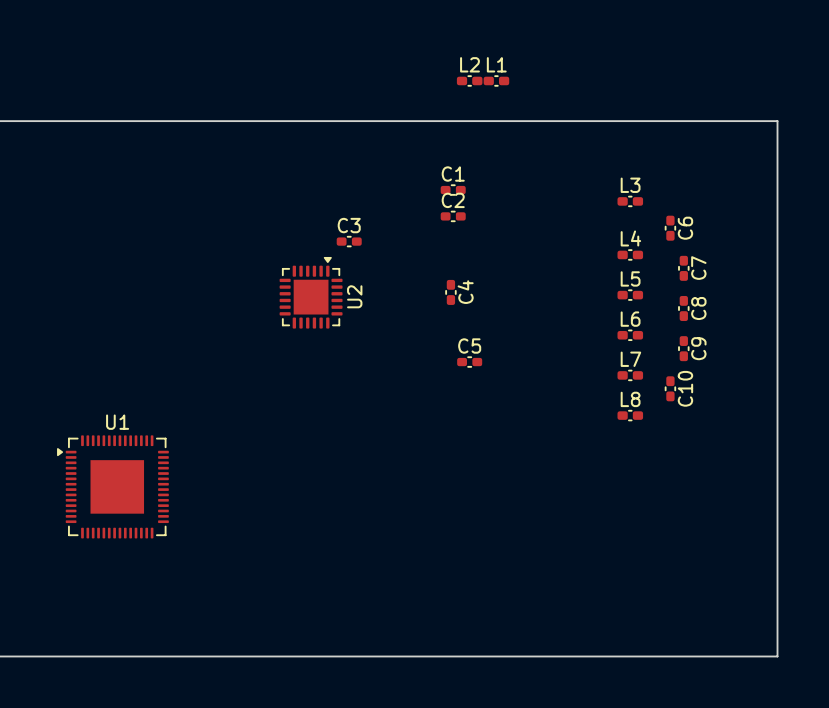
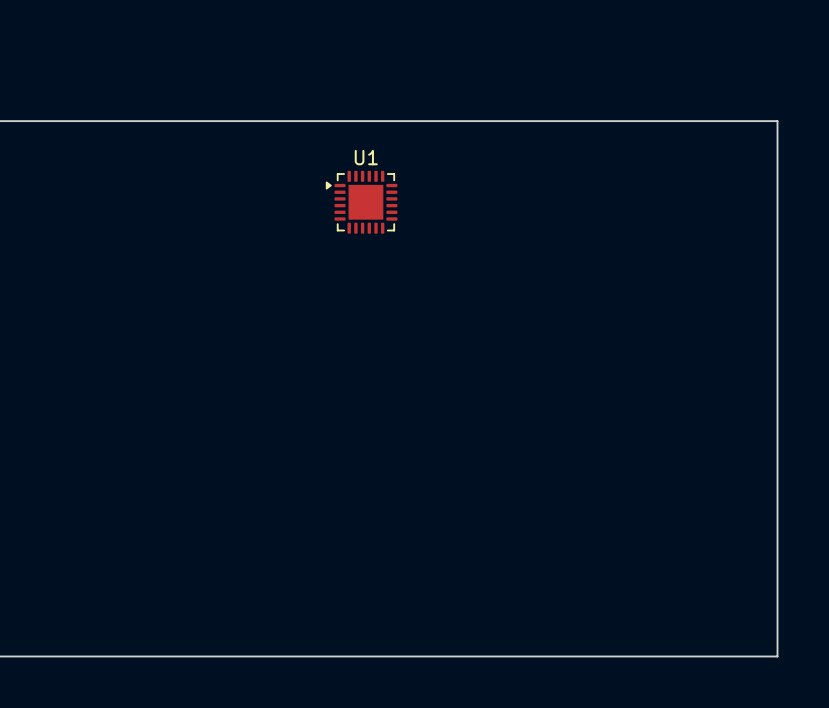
L2: (469, 80) -> none
L1: (496, 80) -> none
C1: (453, 190) -> none
L3: (630, 201) -> none
C2: (453, 216) -> none
C6: (670, 228) -> none
C3: (349, 241) -> none
L4: (630, 254) -> none
C7: (683, 268) -> none
U2: (311, 292) -> none
C4: (450, 292) -> none
L5: (630, 295) -> none
C8: (683, 308) -> none
L6: (630, 335) -> none
C9: (683, 348) -> none
C5: (469, 362) -> none
L7: (630, 375) -> none
C10: (670, 388) -> none
L8: (630, 415) -> none
U1 footprint: [57, 435, 169, 539] -> [325, 170, 398, 234]

